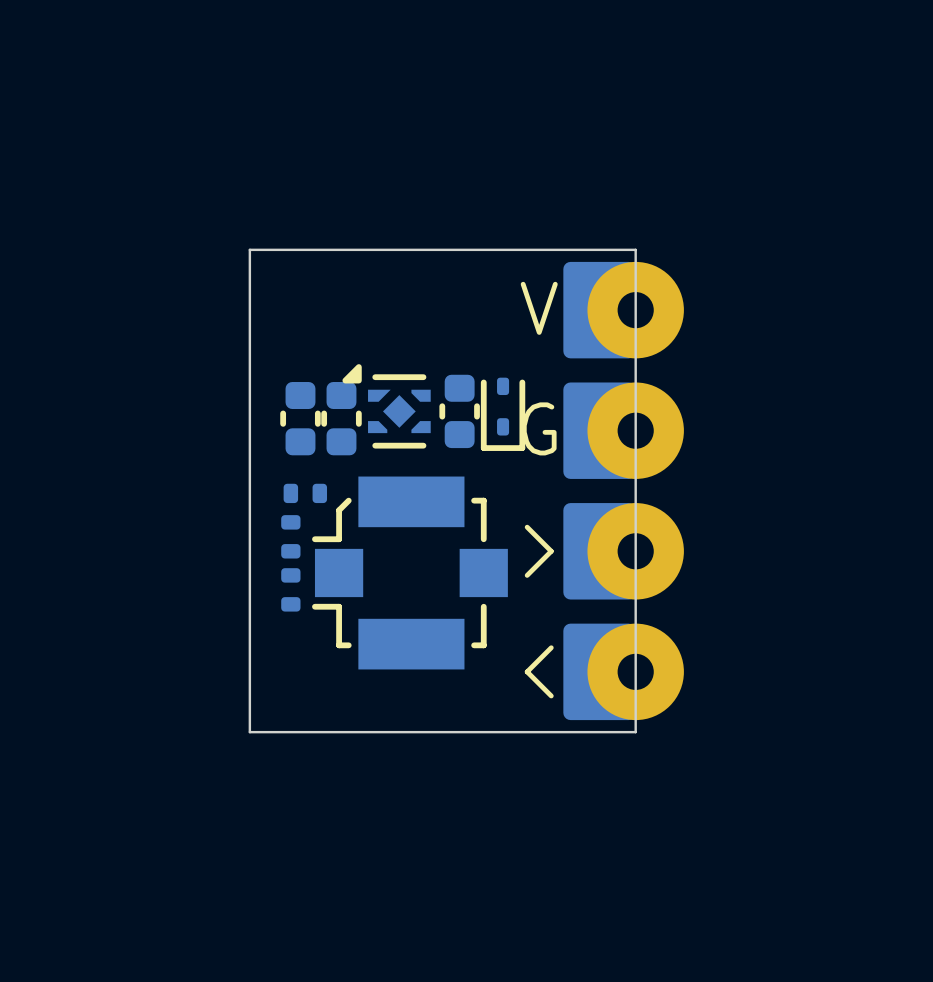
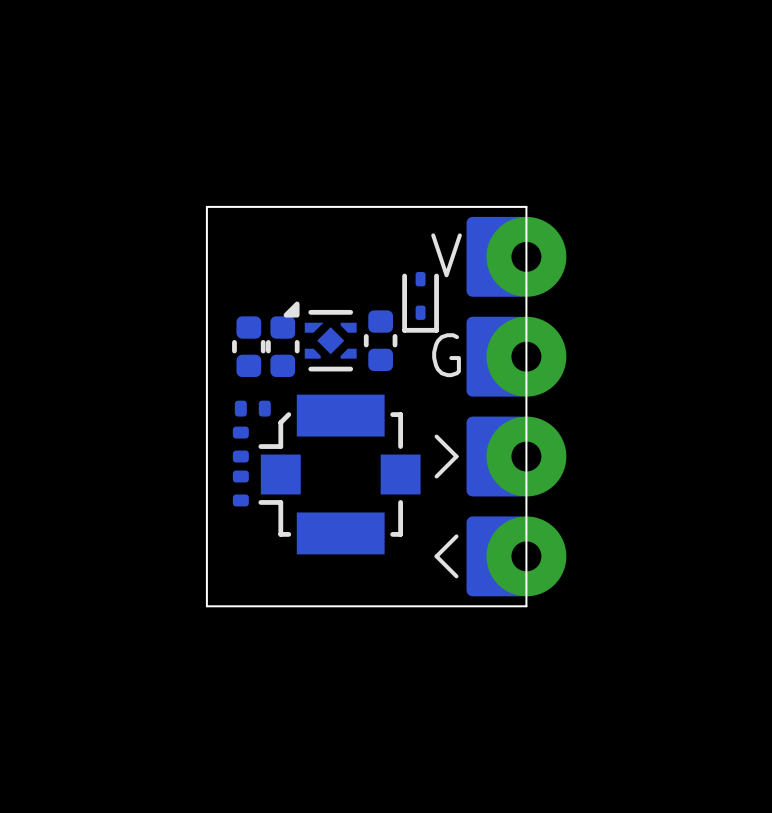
part position: (503, 414) -> (420, 302)

